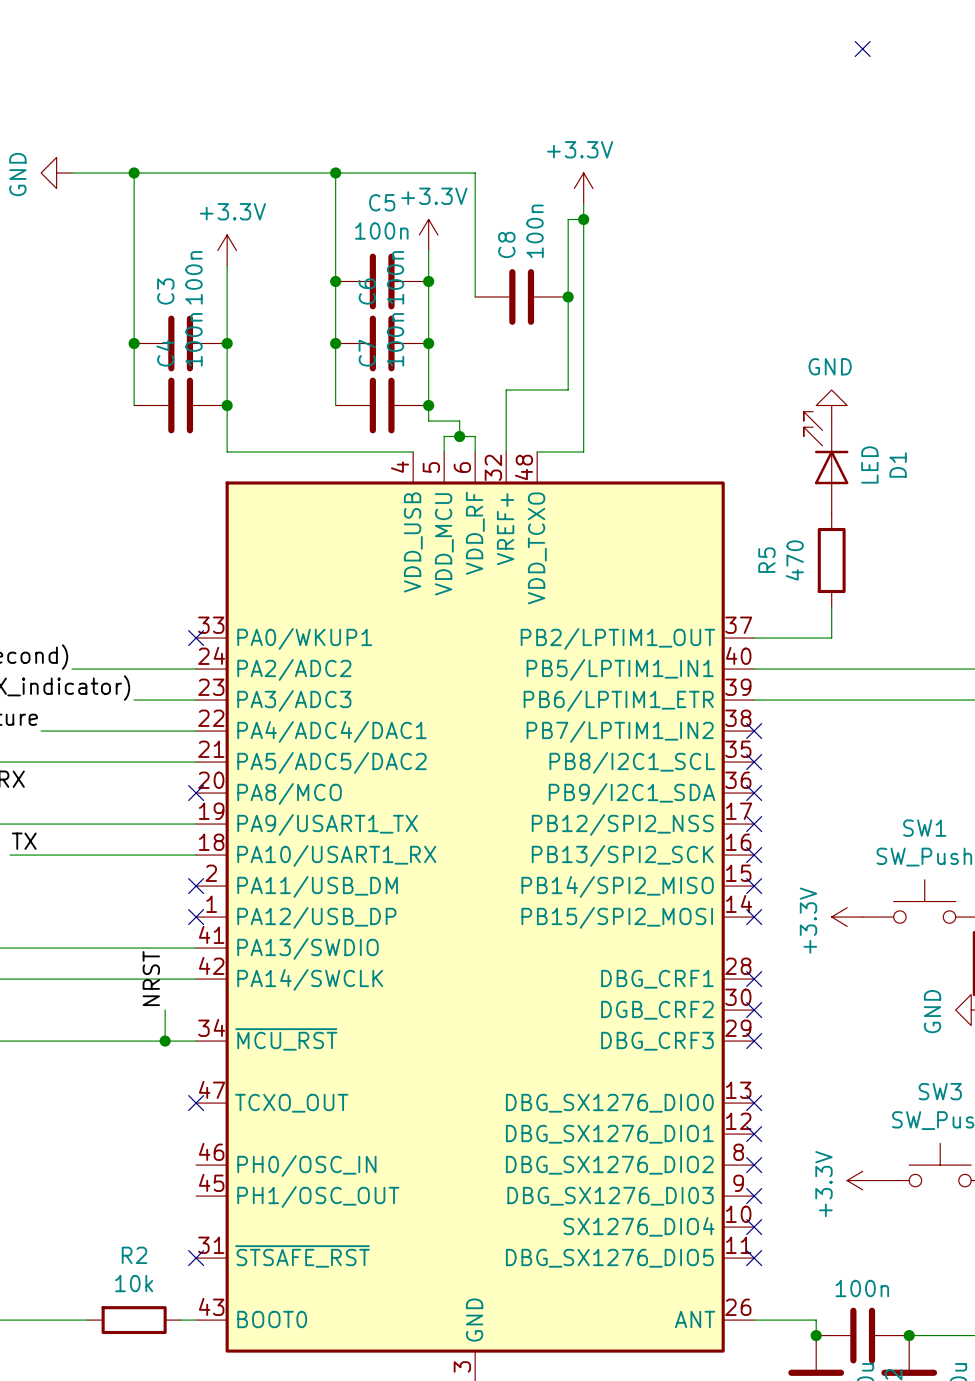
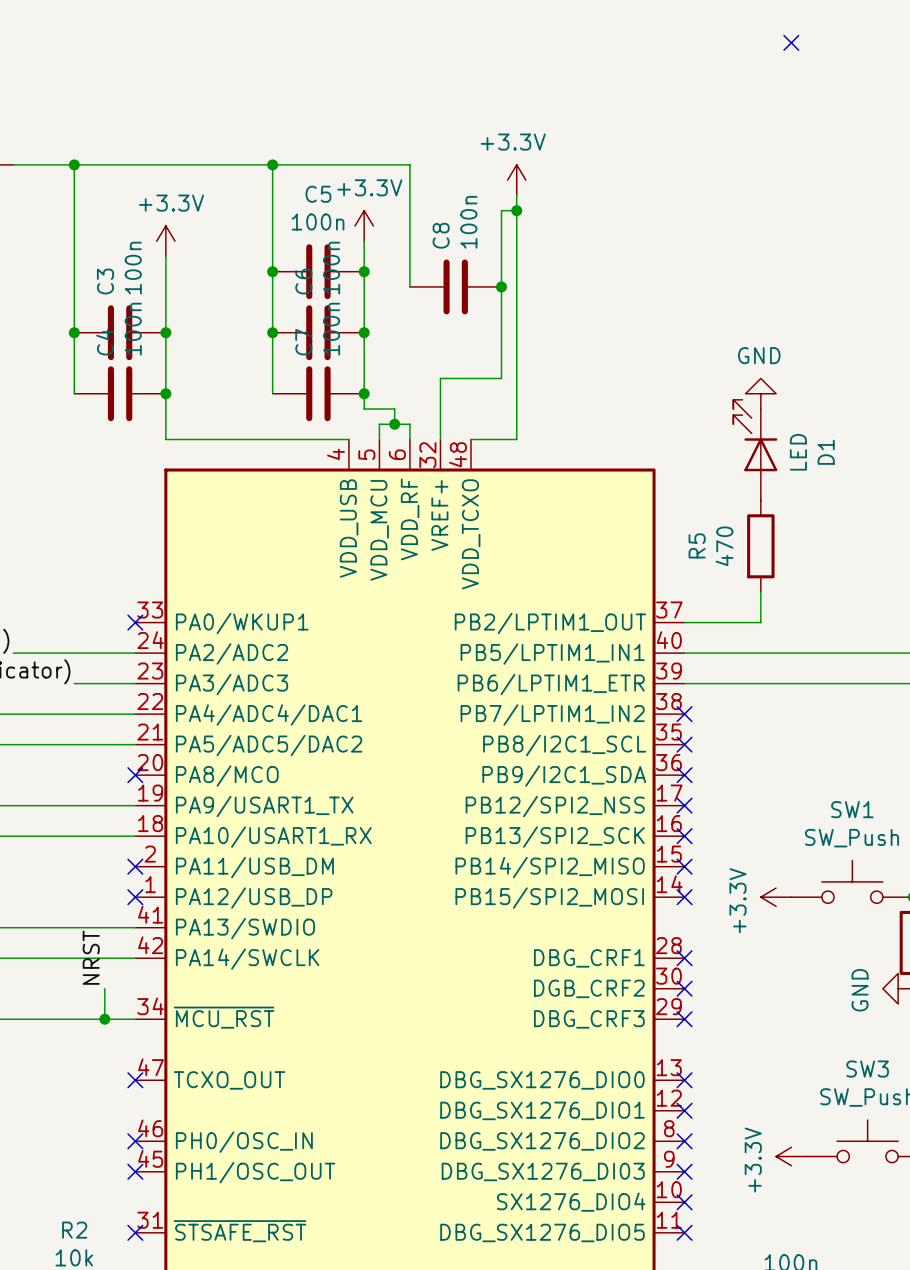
no-connect mark: none -> (135, 1141)
no-connect mark: none -> (135, 1171)

